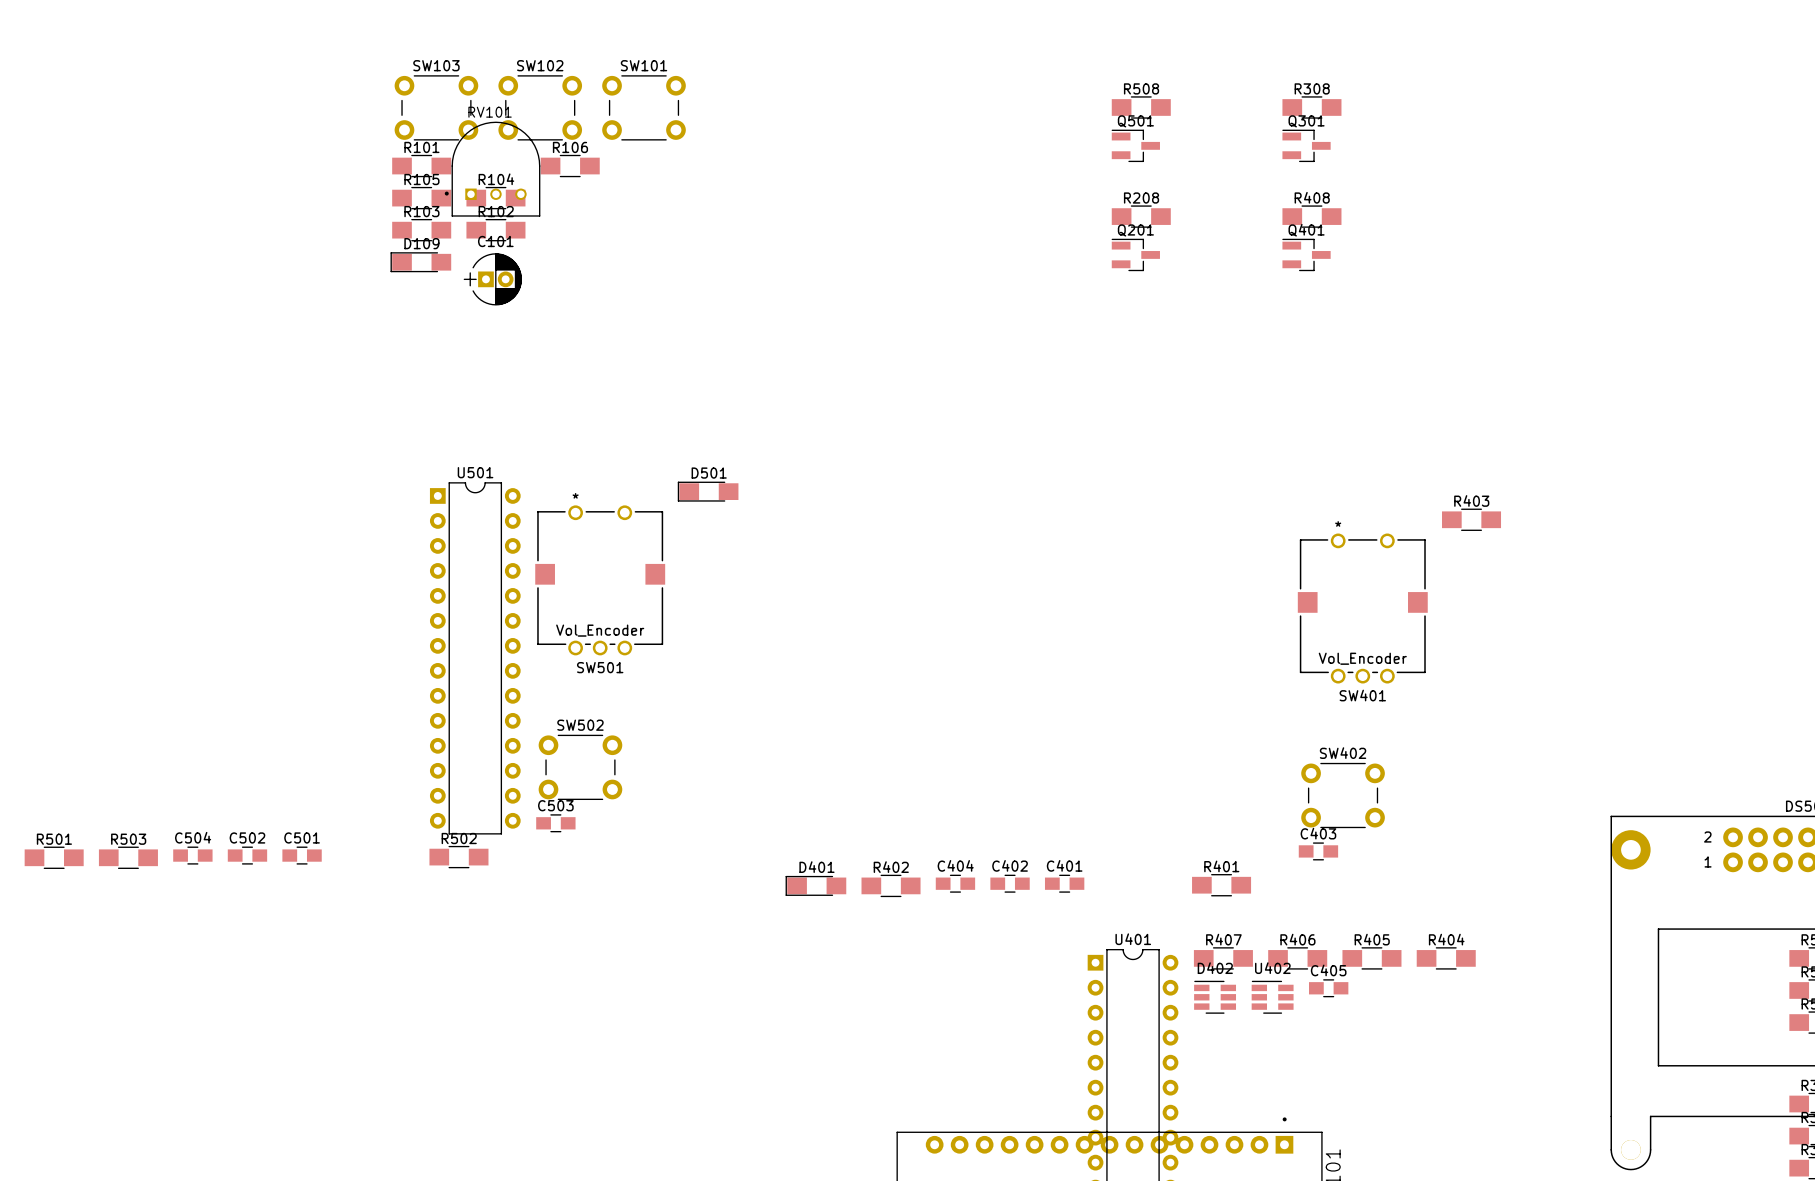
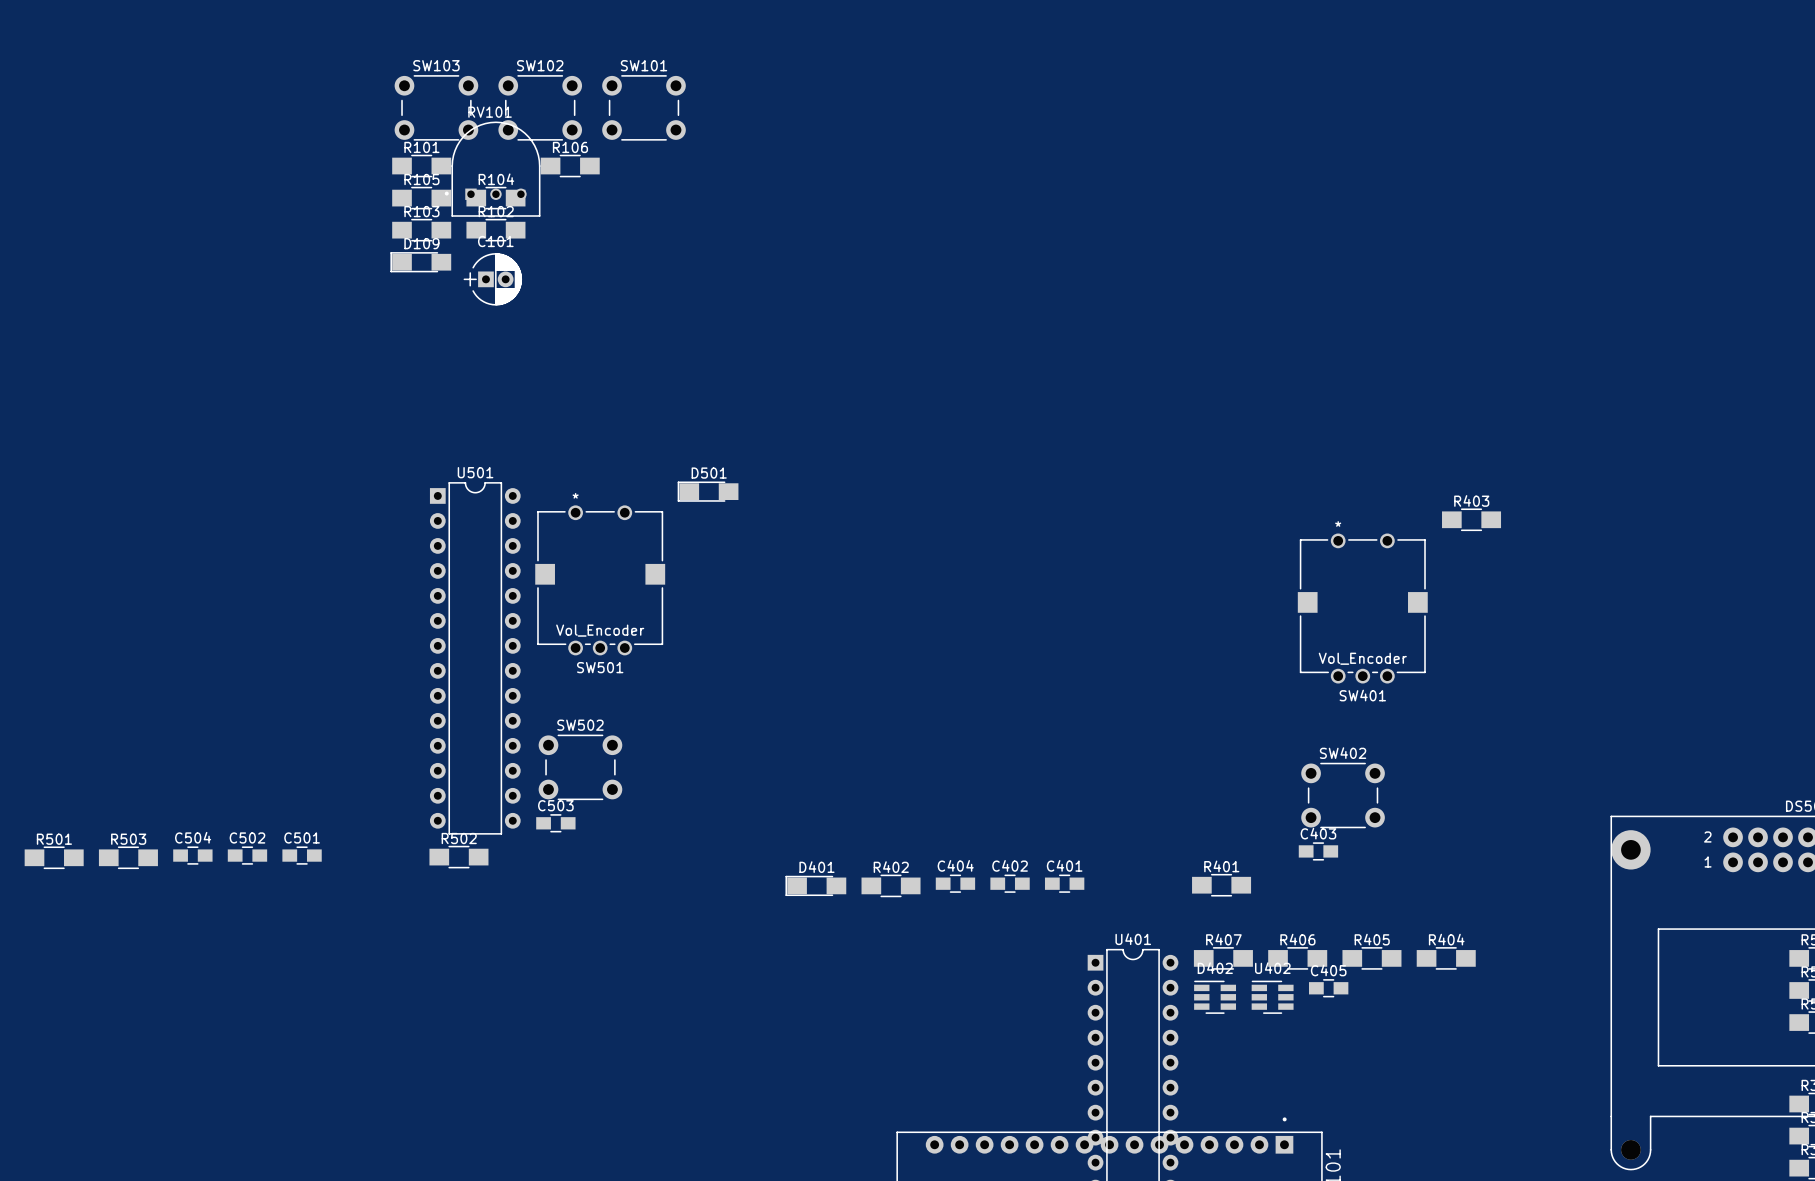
R508: (1141, 107) -> none
R308: (1311, 107) -> none
Q501: (1135, 145) -> none
Q301: (1306, 145) -> none
R208: (1141, 216) -> none
R408: (1311, 216) -> none
Q201: (1135, 254) -> none
Q401: (1306, 254) -> none

